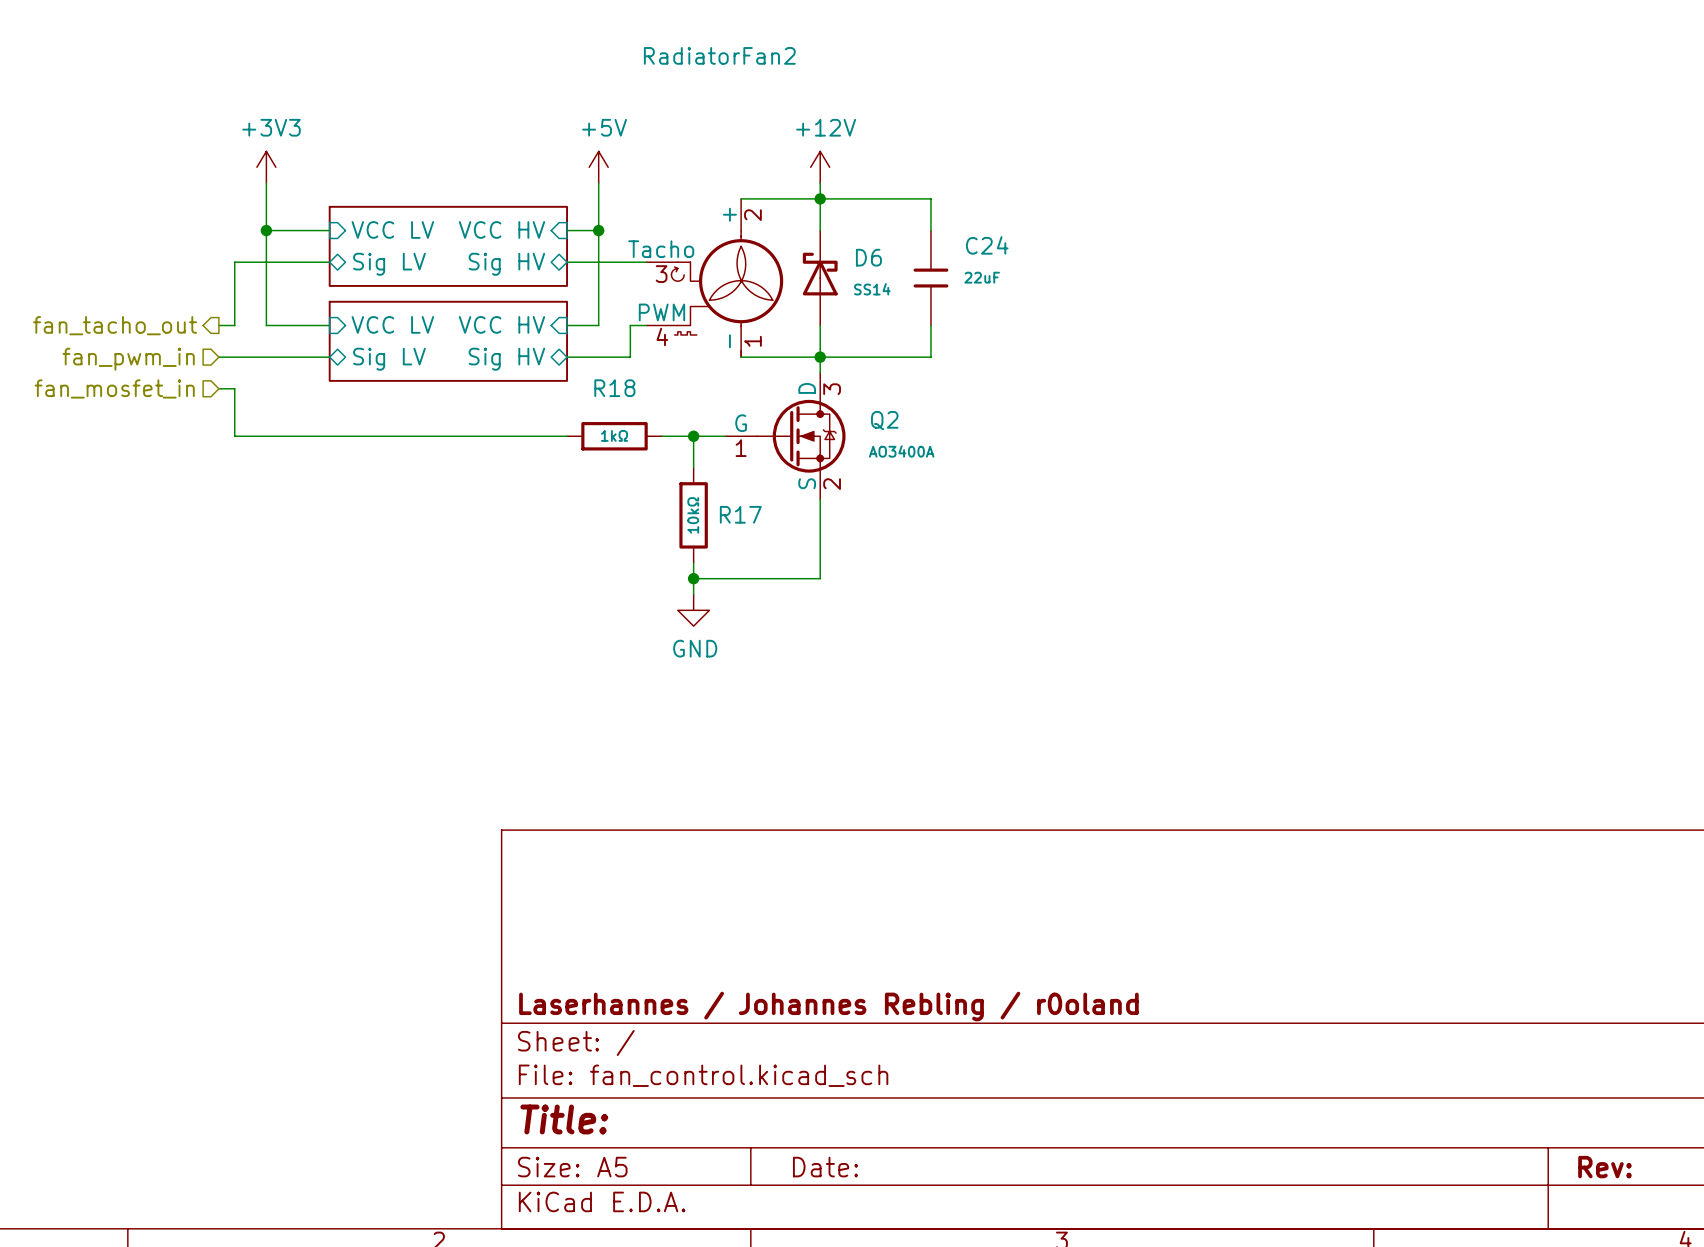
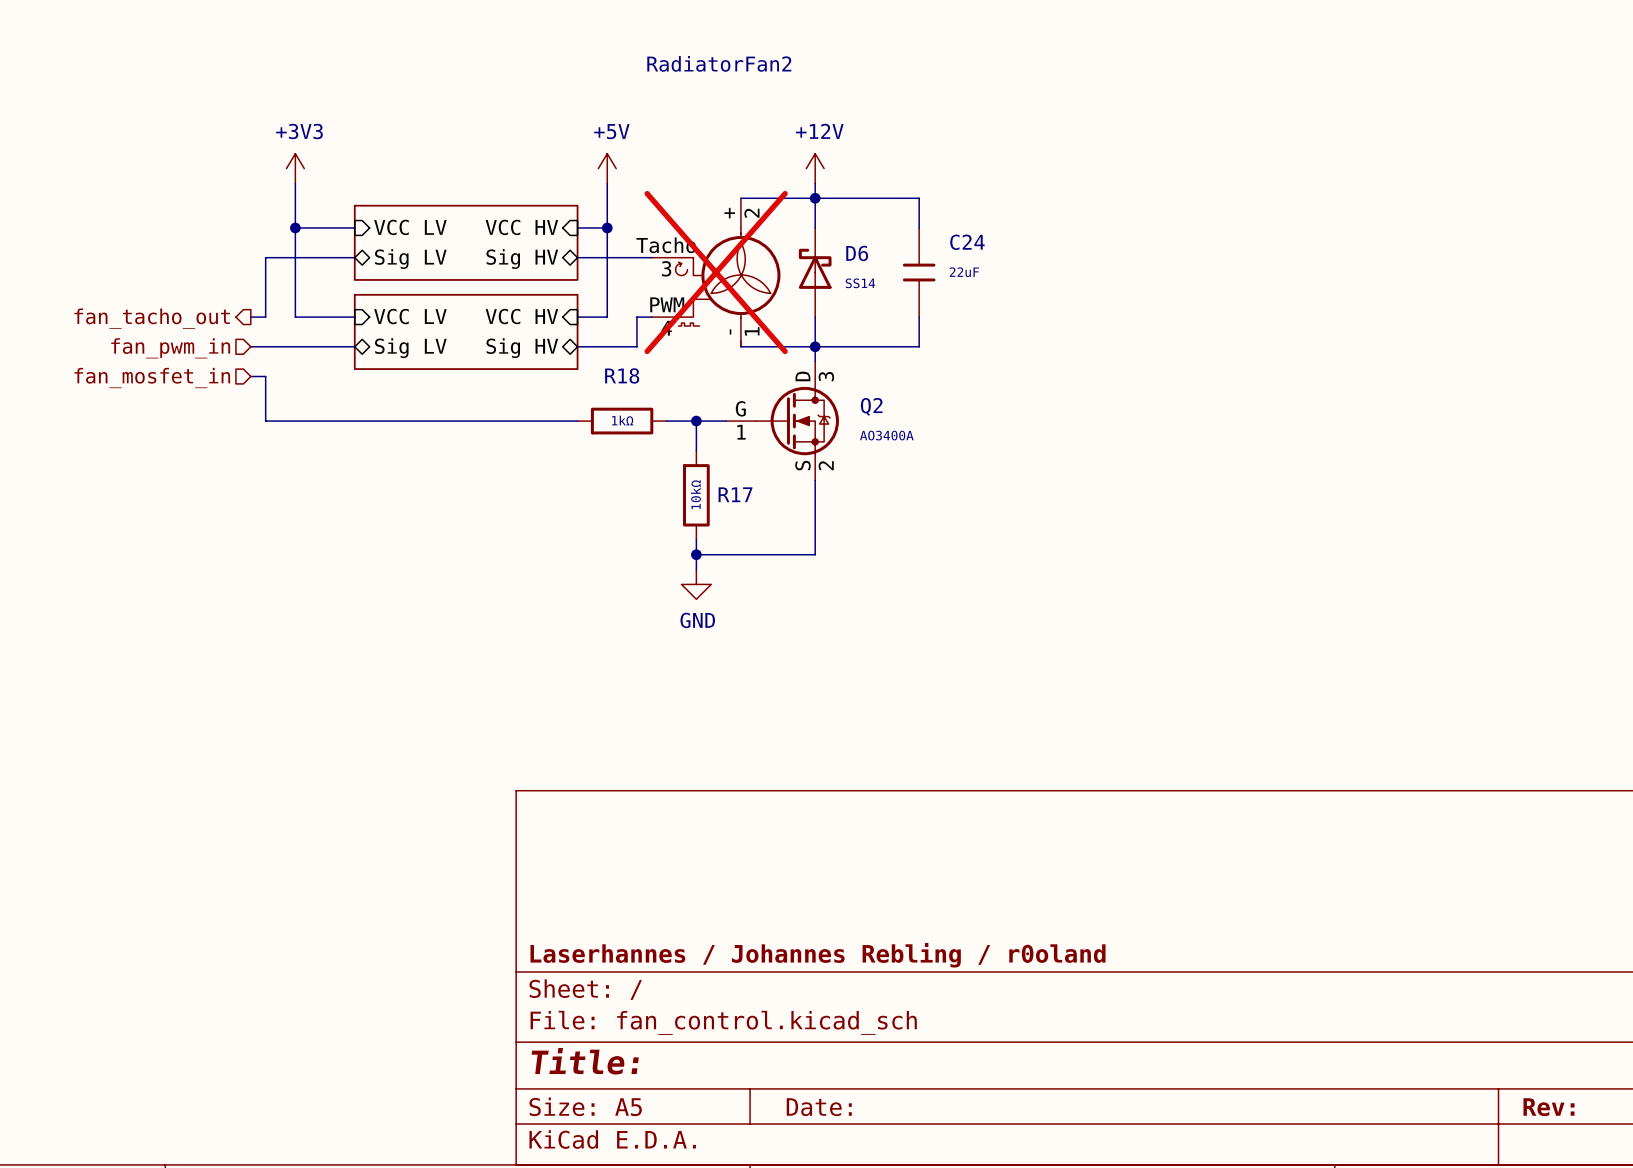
RadiatorFan2 do-not-place cross: none -> (716, 272)

